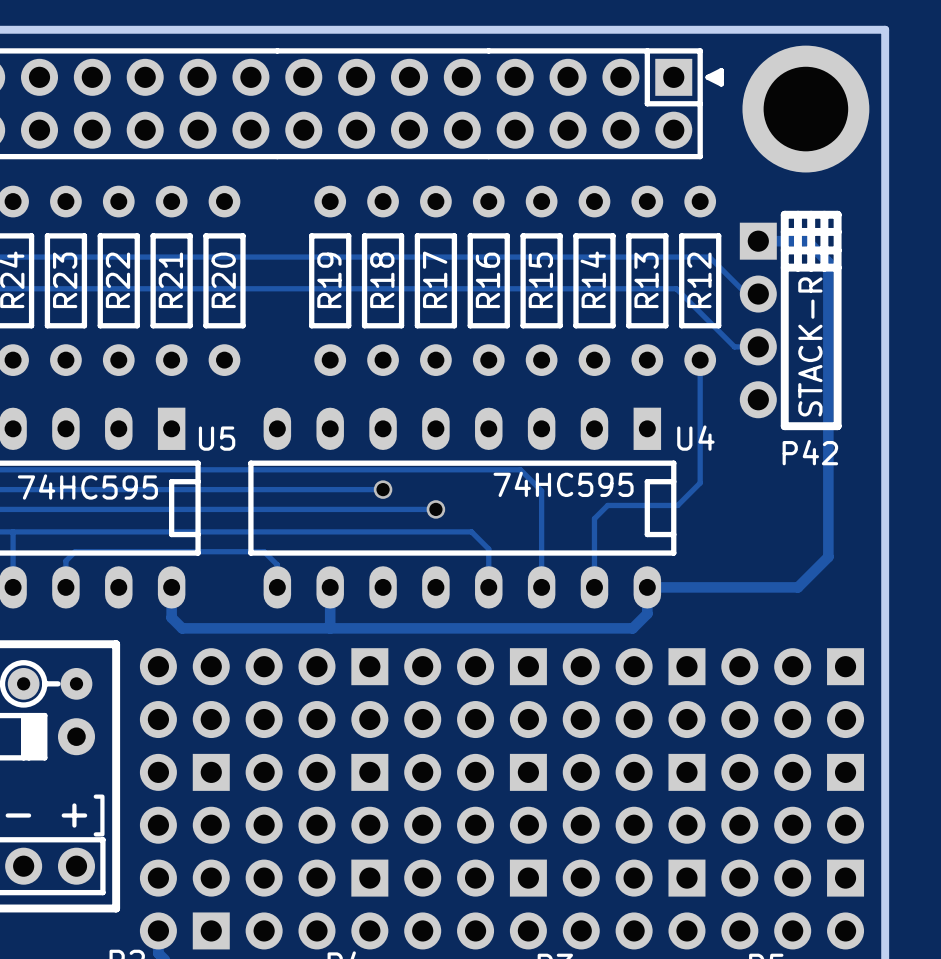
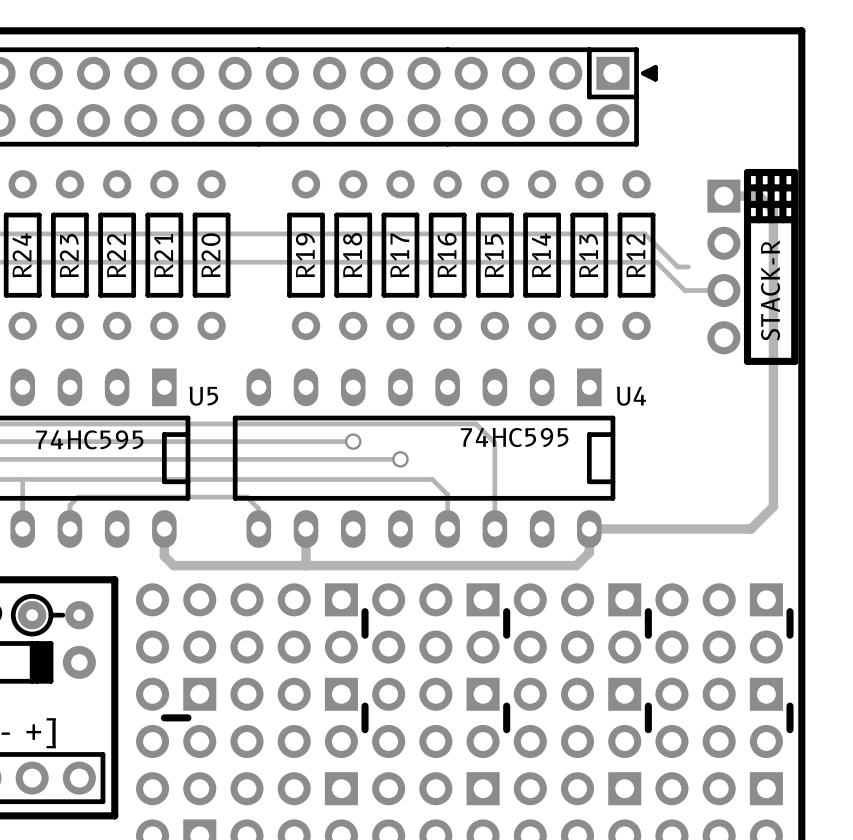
part: (805, 109) -> none
track: (758, 241) (807, 241) (828, 262) (828, 557) (797, 587) -> (723, 196) (759, 196) (773, 210) (773, 506) (751, 529) (723, 529)
track: (676, 288) (734, 346) (758, 346) -> (615, 262) (656, 262) (684, 290) (723, 290)
part: none -> STACK-R (752, 266)
P42: STACK-R (790, 320) -> none
track: (700, 360) (700, 483) (677, 505) (607, 505) (594, 518) (594, 587) -> none
part footprint: [139, 648, 230, 791] -> [136, 583, 217, 722]
part footprint: [245, 648, 389, 739] -> [230, 583, 369, 664]
part footprint: [404, 648, 547, 739] -> [372, 583, 511, 664]
part footprint: [562, 648, 706, 739] -> [513, 583, 652, 664]
part footprint: [721, 648, 865, 739] -> [655, 583, 794, 664]
part footprint: [245, 753, 389, 844] -> [230, 677, 369, 759]
part footprint: [404, 753, 547, 844] -> [372, 677, 511, 759]
part footprint: [562, 753, 706, 844] -> [513, 677, 652, 759]
part footprint: [721, 753, 865, 844] -> [655, 677, 794, 759]

